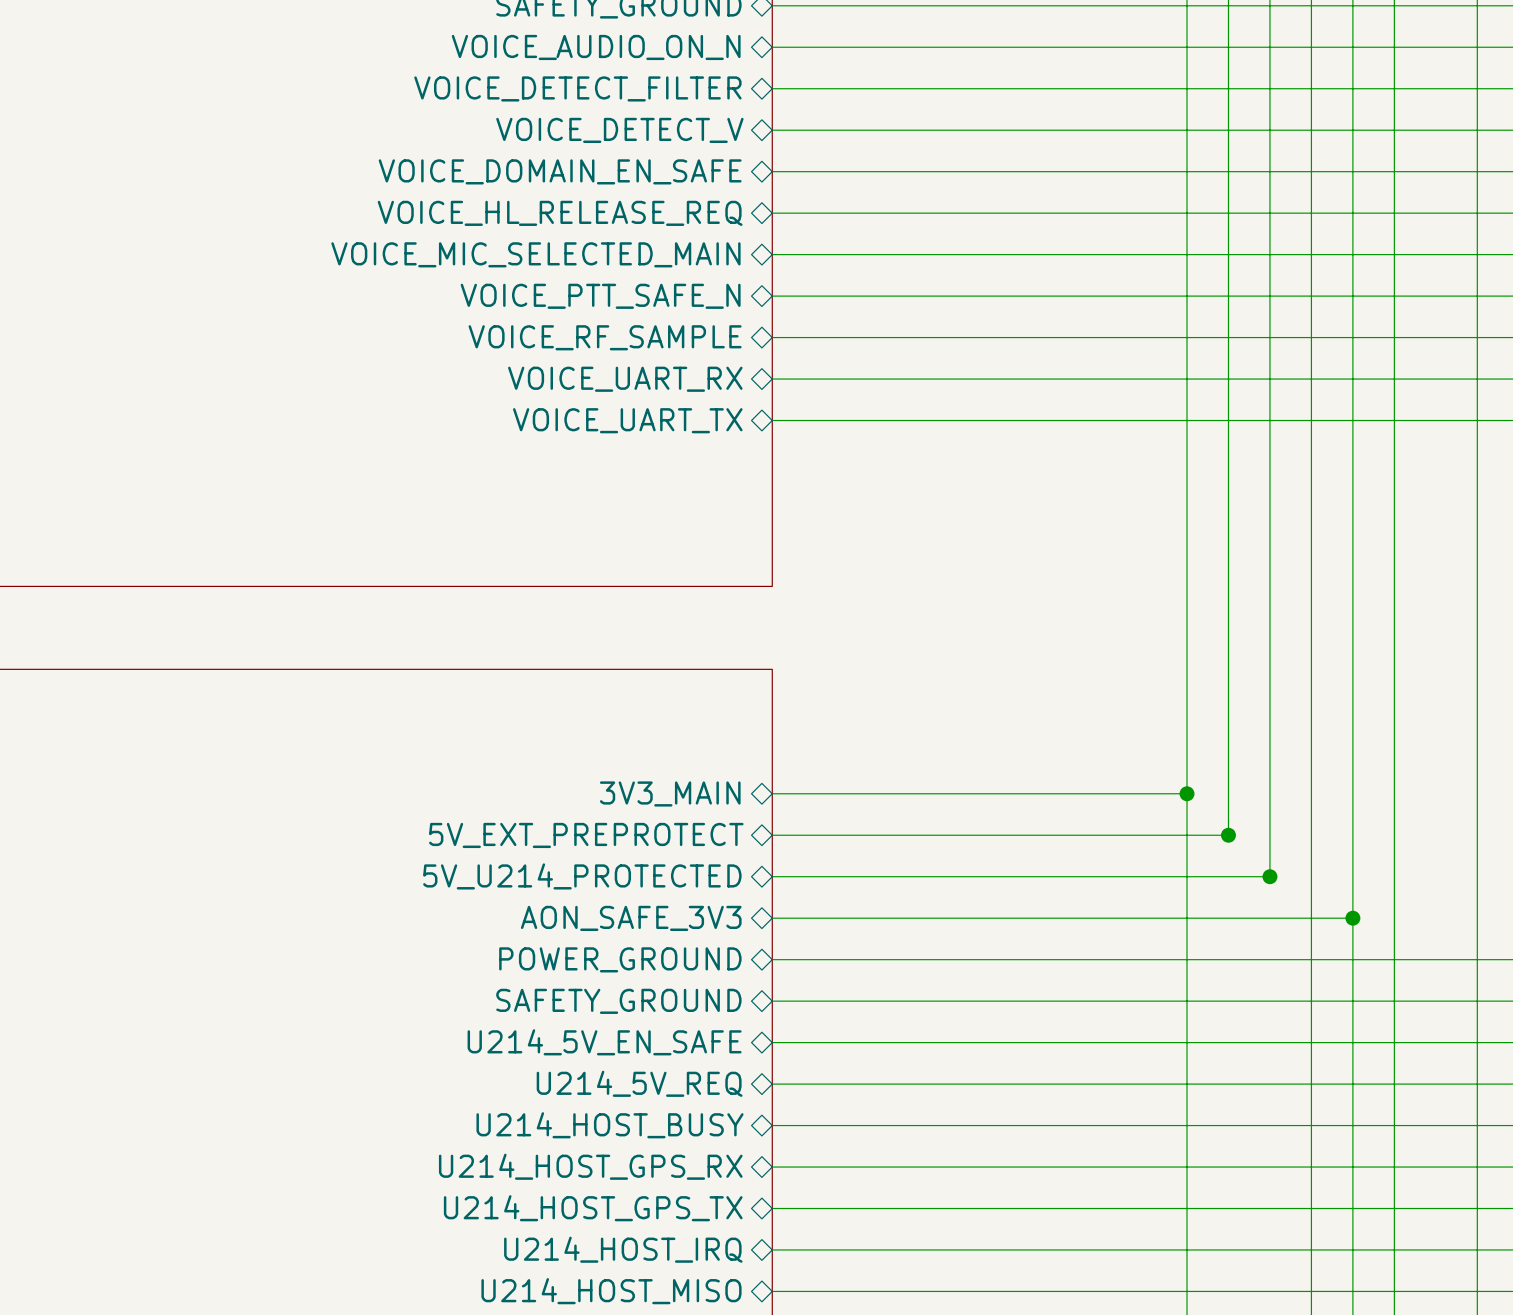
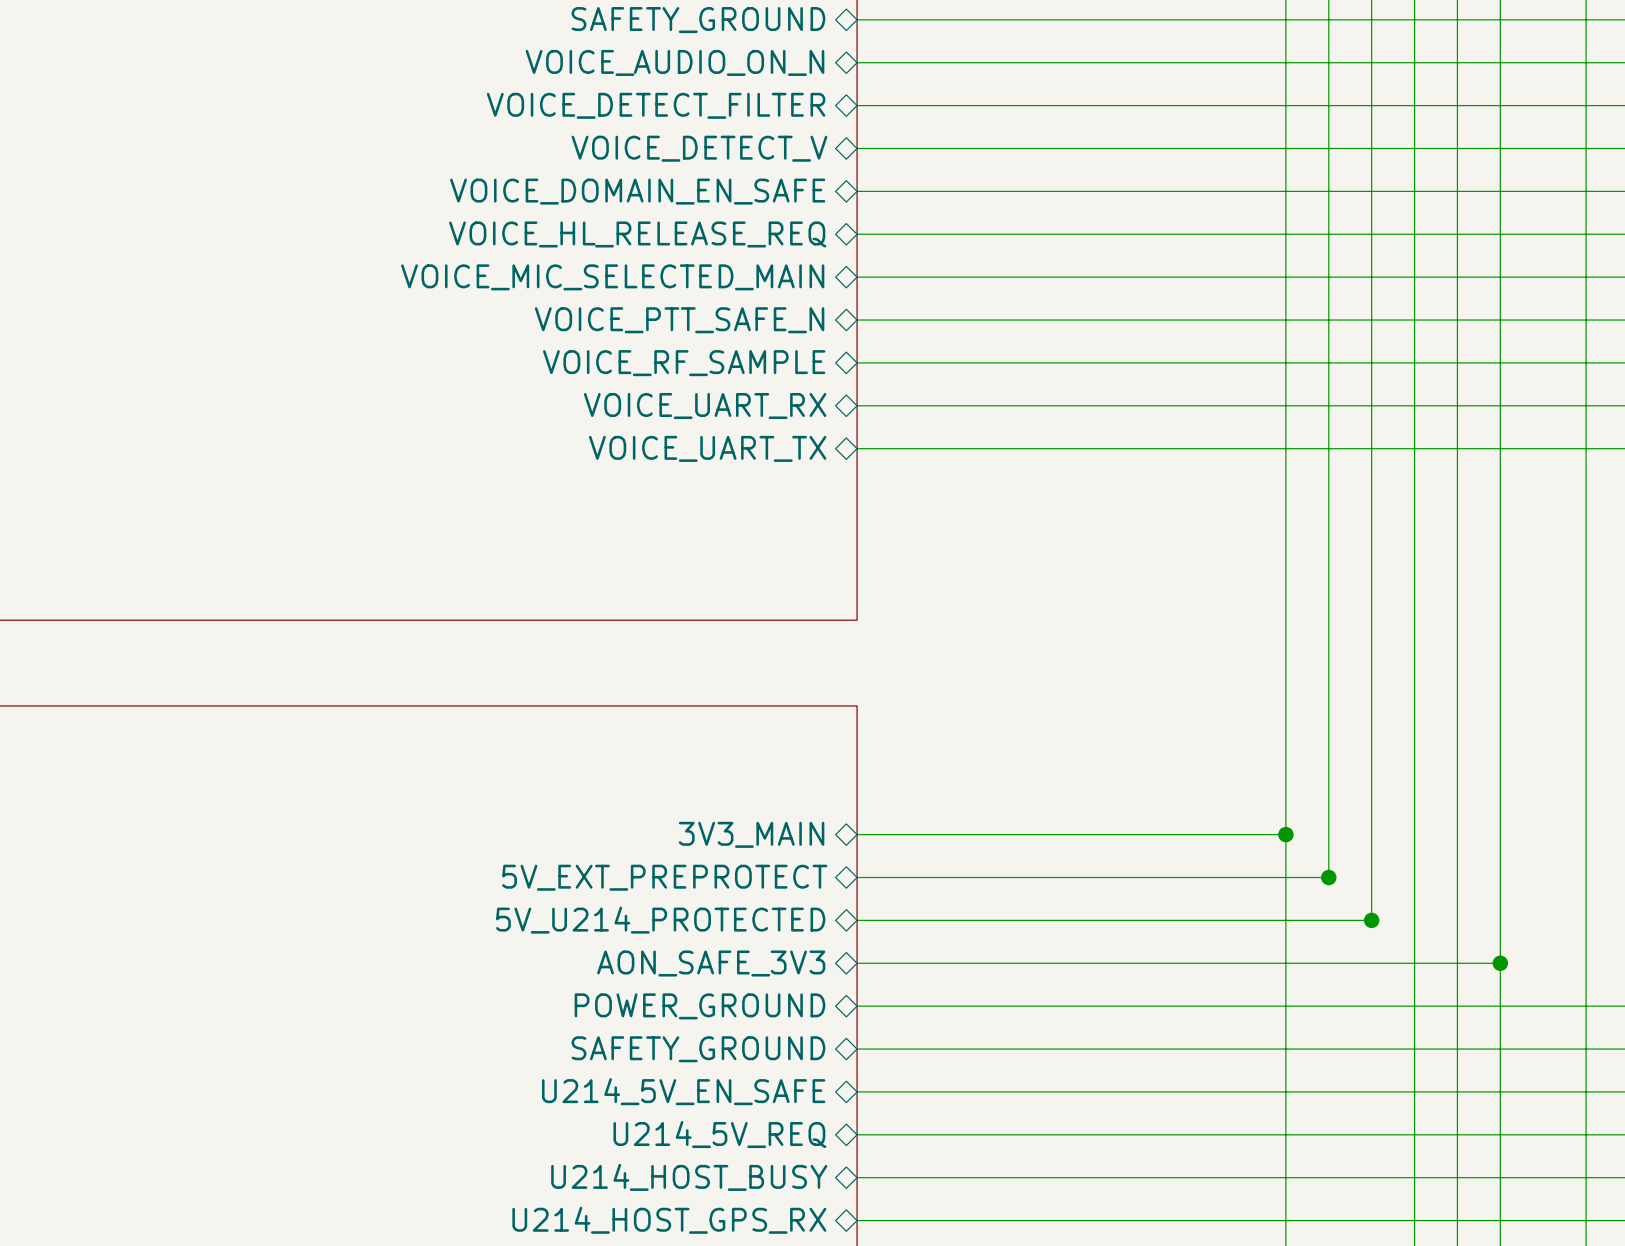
wire: none -> (1457, 963) (1500, 963)
junction position: (1352, 918) -> (1500, 963)

